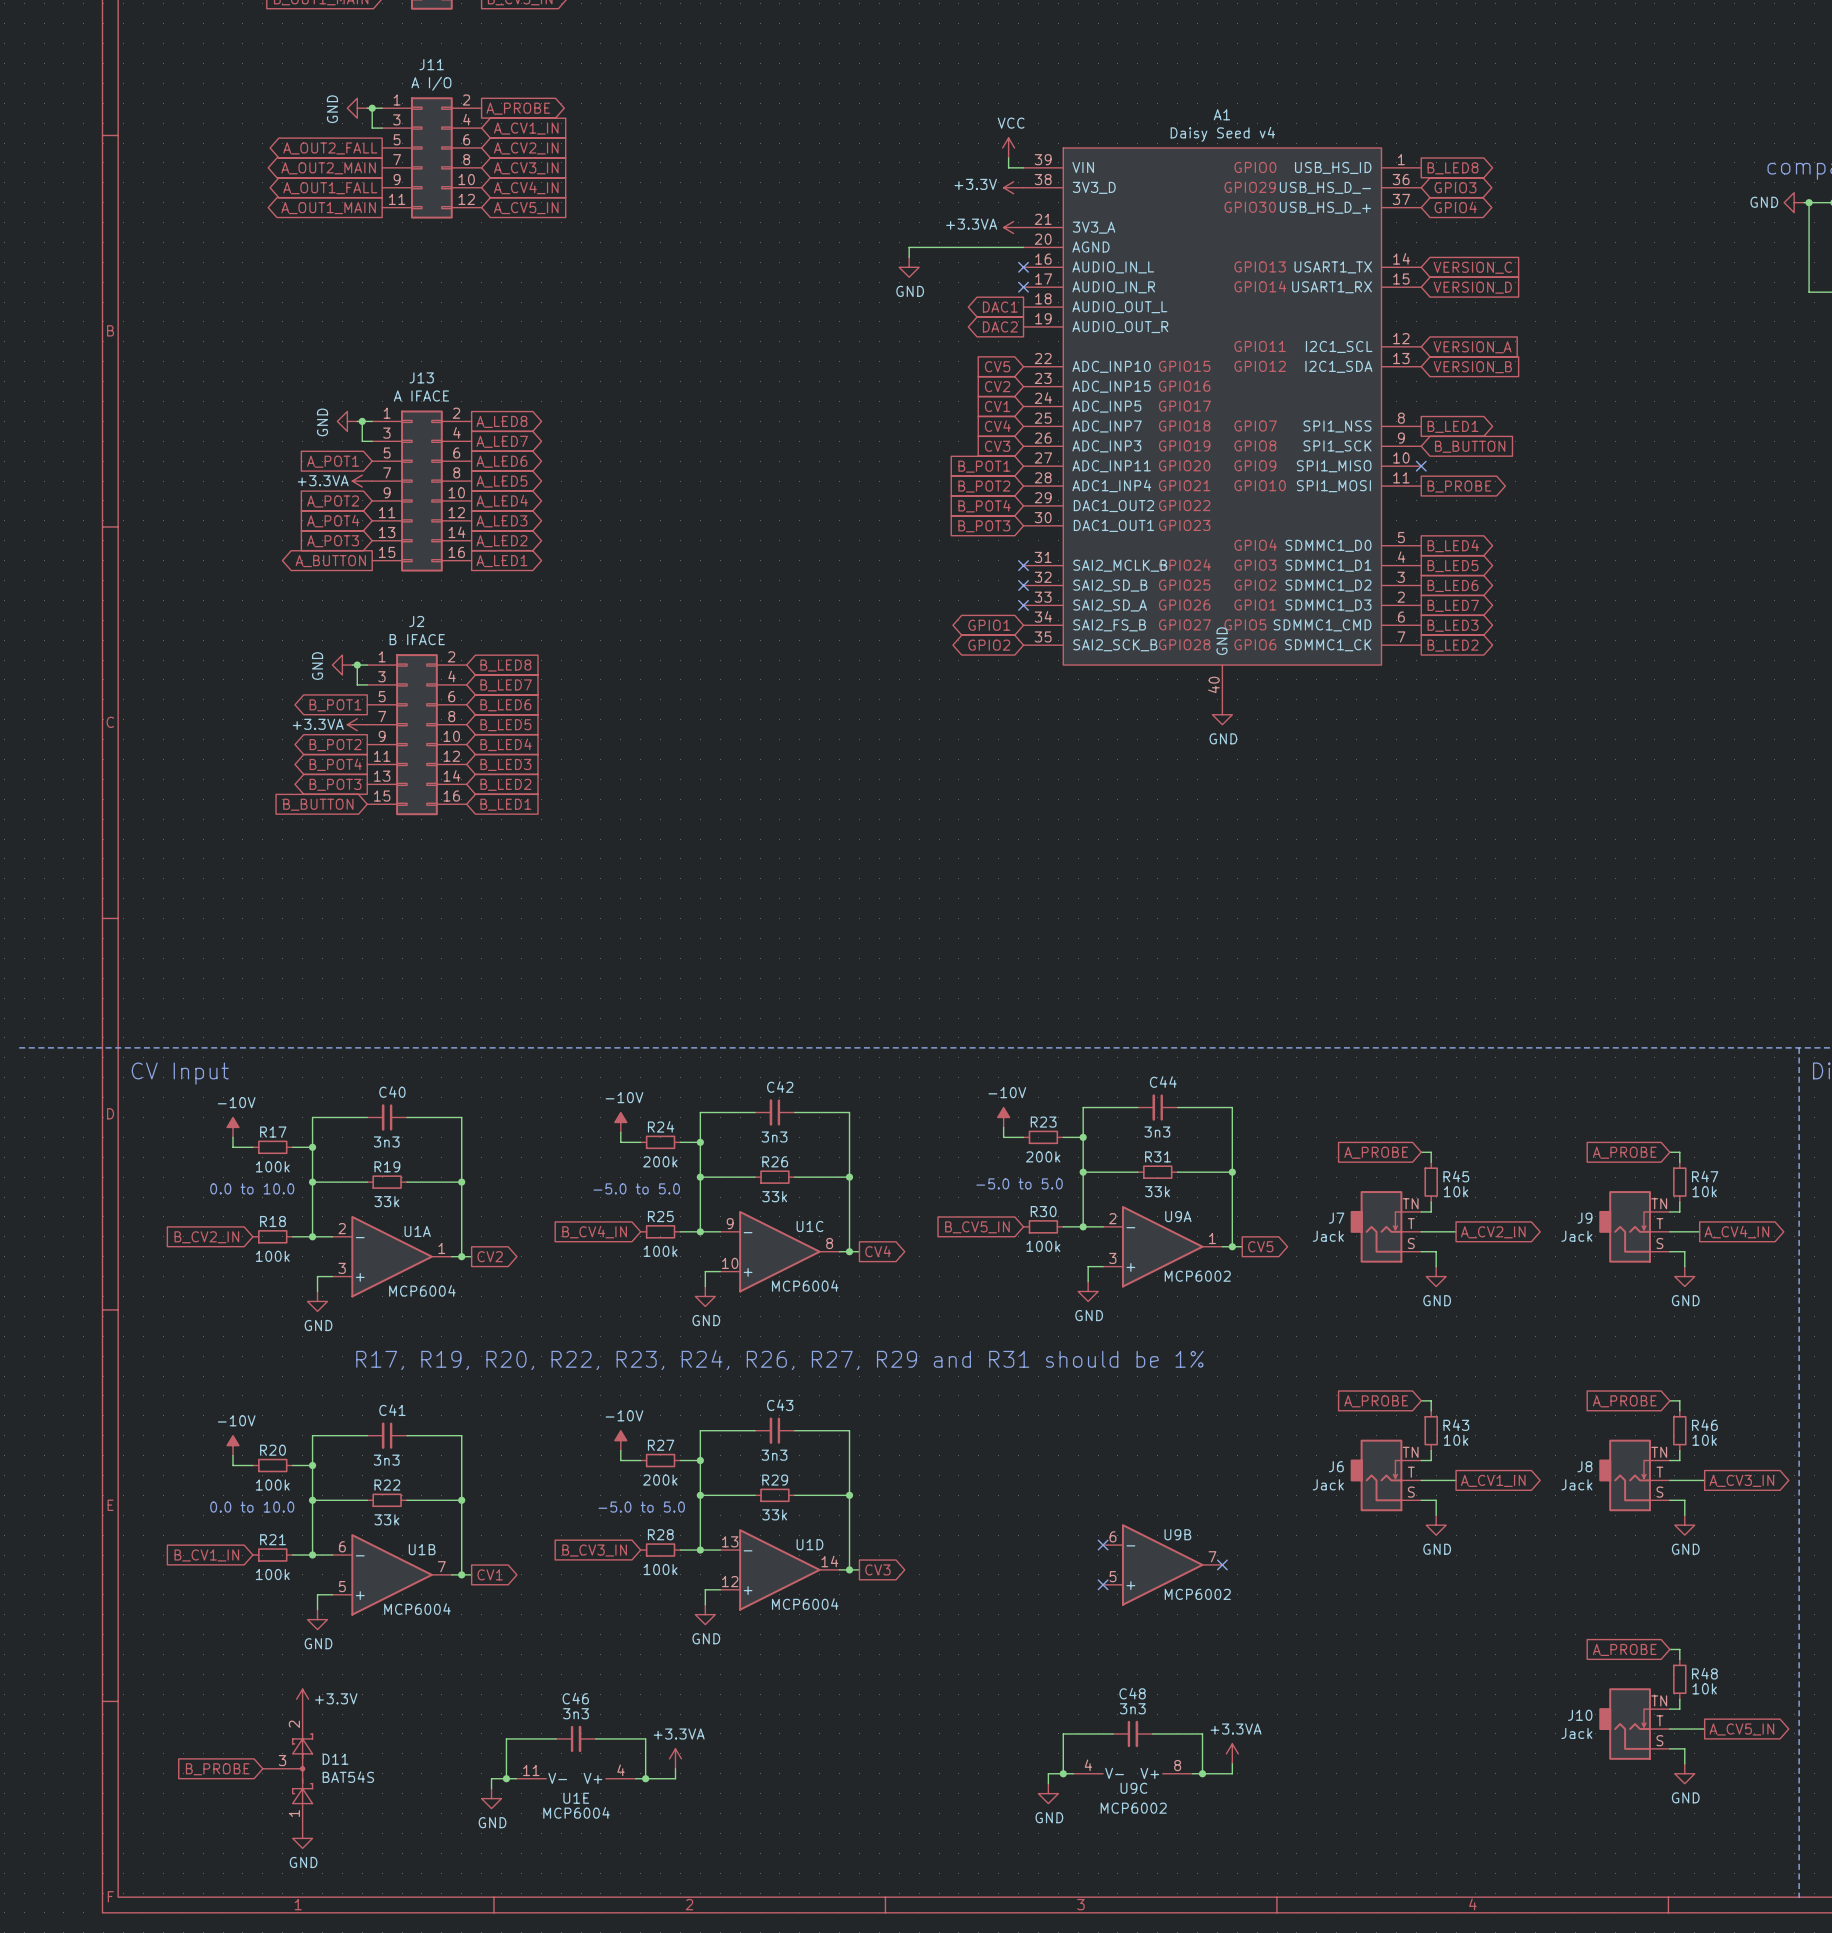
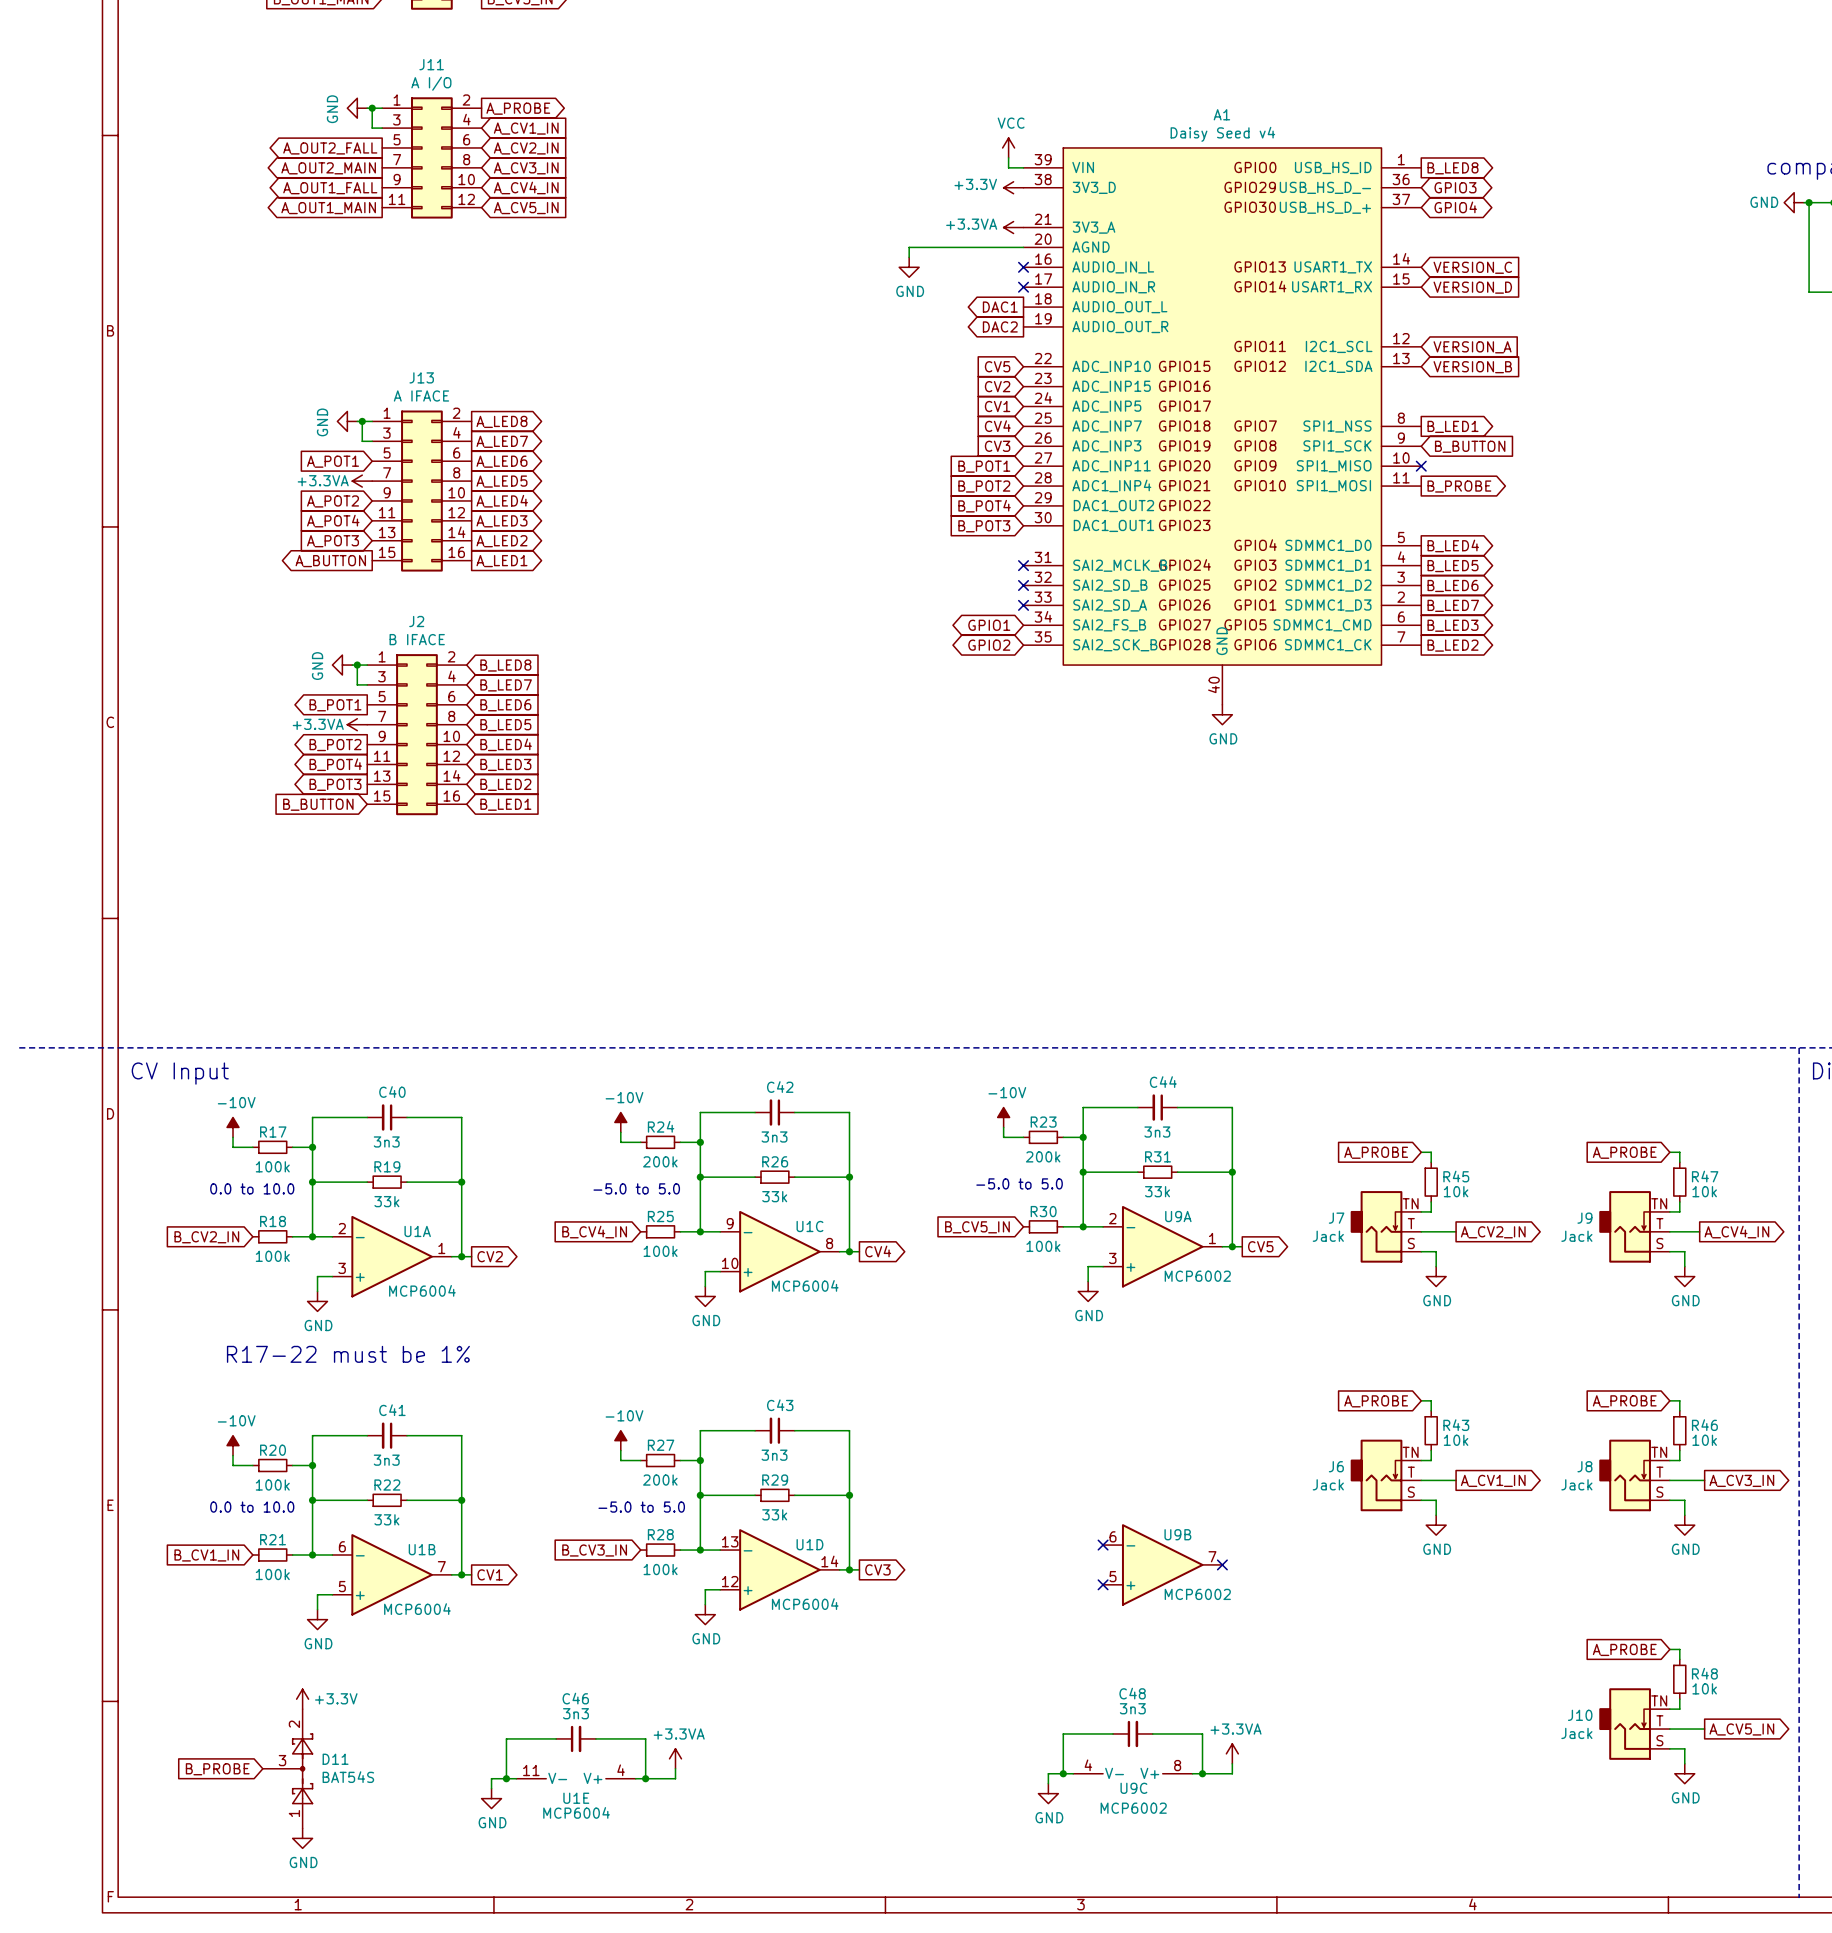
text: none -> R17-22 must be 1% (348, 1354)
text: R17, R19, R20, R22, R23, R24, R26, R27, R29 and R31 should be 1% (779, 1360) -> none

